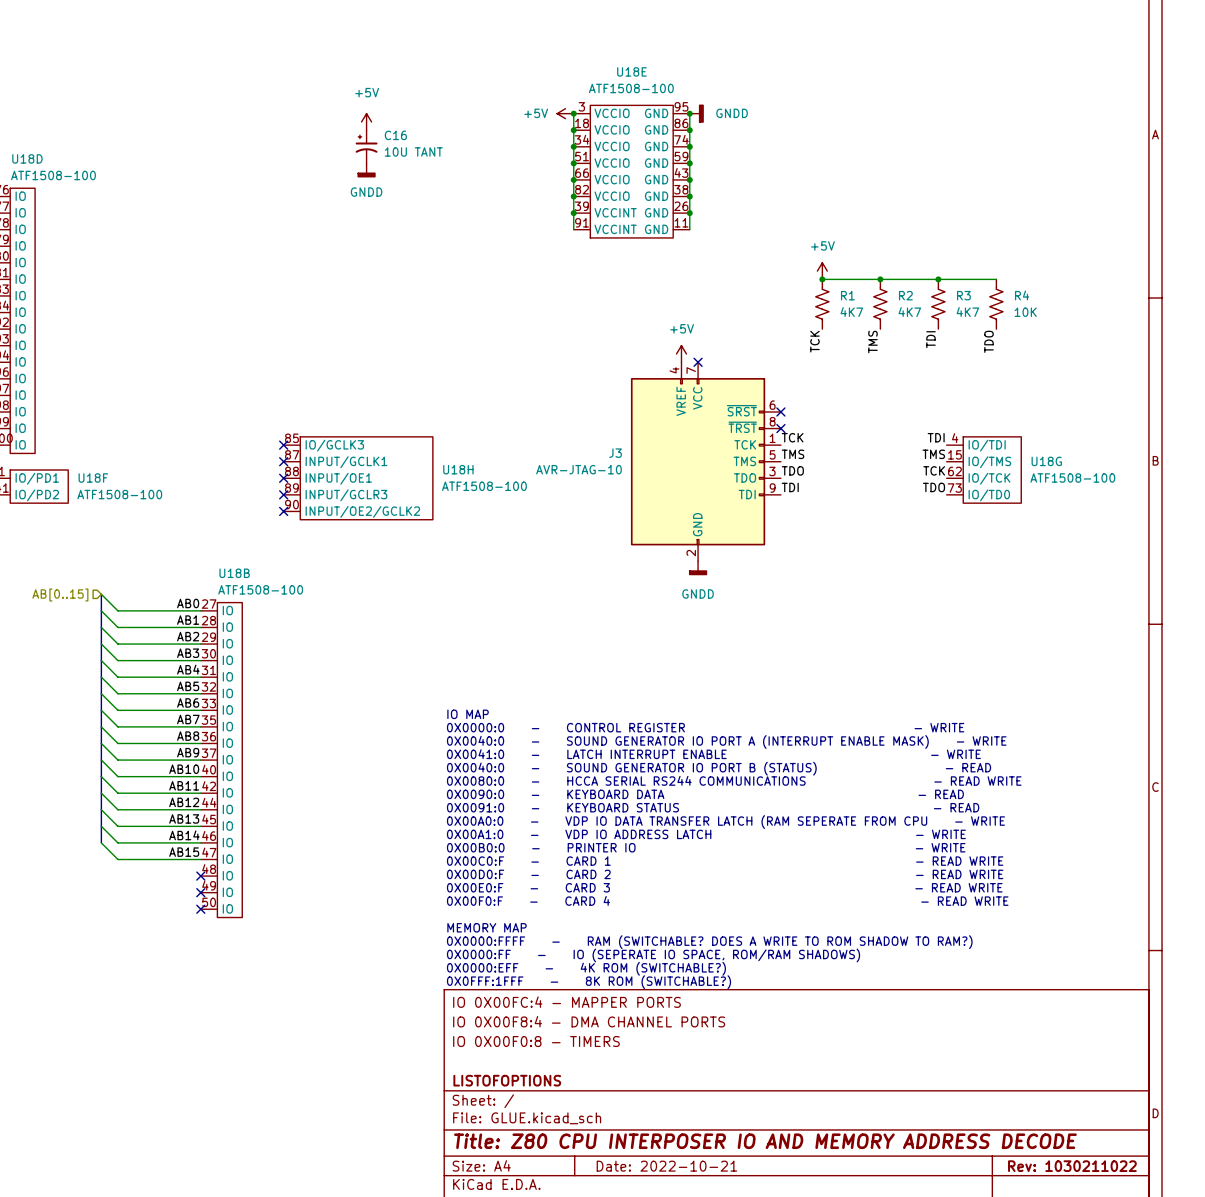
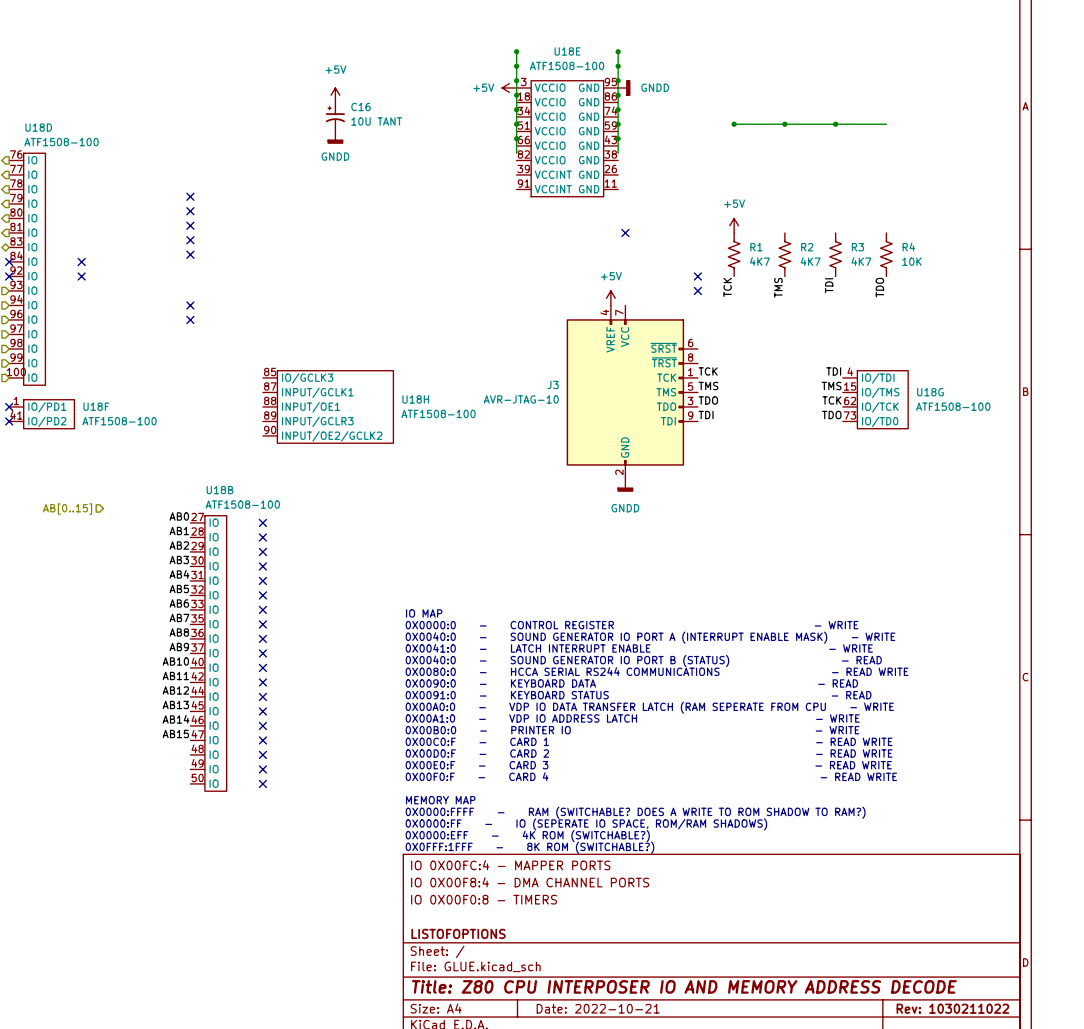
junction: none -> (516, 51)
junction: none -> (618, 51)
junction: none -> (516, 66)
junction: none -> (618, 66)
junction: none -> (516, 80)
junction: none -> (618, 80)
junction: (573, 113) -> none
junction: (689, 113) -> none
junction: none -> (516, 95)
junction: none -> (618, 95)
junction: (573, 130) -> none
junction: (689, 130) -> none
junction: none -> (516, 109)
junction: none -> (618, 109)
junction: (573, 146) -> none
junction: (689, 146) -> none
junction: none -> (516, 124)
junction: none -> (618, 124)
junction: none -> (734, 124)
junction: none -> (784, 124)
junction: none -> (835, 124)
junction: (573, 163) -> none
junction: (689, 163) -> none
junction: none -> (516, 138)
junction: none -> (618, 138)
junction: (573, 179) -> none
junction: (689, 179) -> none
wire: (573, 188) (573, 229) -> (516, 51) (516, 87)
wire: (689, 188) (689, 229) -> (618, 51) (618, 87)
junction: (573, 196) -> none
junction: (689, 196) -> none
junction: (573, 213) -> none
junction: (689, 213) -> none
no-connect mark: none -> (190, 196)
no-connect mark: none -> (190, 211)
no-connect mark: none -> (190, 225)
no-connect mark: none -> (625, 232)
wire: (822, 279) (996, 279) -> (734, 124) (886, 124)
junction: (822, 279) -> none
junction: (880, 279) -> none
junction: (938, 279) -> none
no-connect mark: none -> (190, 240)
no-connect mark: none -> (190, 254)
no-connect mark: none -> (81, 261)
no-connect mark: none -> (81, 276)
no-connect mark: none -> (697, 276)
no-connect mark: none -> (697, 290)
no-connect mark: none -> (190, 305)
no-connect mark: (698, 362) -> none
no-connect mark: none -> (190, 319)
no-connect mark: (780, 411) -> none
no-connect mark: (780, 428) -> none
no-connect mark: (283, 445) -> none
no-connect mark: (283, 461) -> none
no-connect mark: (283, 478) -> none
no-connect mark: (283, 494) -> none
no-connect mark: (283, 511) -> none
wire: (101, 594) (117, 610) (200, 610) -> none
bus: (101, 594) (101, 842) -> none
wire: (101, 610) (117, 627) (200, 627) -> none
no-connect mark: none -> (262, 522)
wire: (101, 627) (117, 644) (200, 644) -> none
no-connect mark: none -> (262, 537)
wire: (101, 644) (117, 660) (200, 660) -> none
no-connect mark: none -> (262, 551)
wire: (101, 660) (117, 677) (200, 677) -> none
no-connect mark: none -> (262, 566)
wire: (101, 677) (117, 693) (200, 693) -> none
no-connect mark: none -> (262, 580)
wire: (101, 693) (117, 710) (200, 710) -> none
no-connect mark: none -> (262, 595)
wire: (101, 710) (117, 726) (200, 726) -> none
no-connect mark: none -> (262, 609)
wire: (101, 726) (117, 743) (200, 743) -> none
no-connect mark: none -> (262, 624)
wire: (101, 743) (117, 760) (200, 760) -> none
no-connect mark: none -> (262, 638)
wire: (101, 760) (117, 776) (200, 776) -> none
no-connect mark: none -> (262, 653)
wire: (101, 776) (117, 793) (200, 793) -> none
no-connect mark: none -> (262, 667)
wire: (101, 793) (117, 809) (200, 809) -> none
no-connect mark: none -> (262, 682)
wire: (101, 809) (117, 826) (200, 826) -> none
no-connect mark: none -> (262, 696)
wire: (101, 826) (117, 842) (200, 842) -> none
no-connect mark: none -> (262, 711)
wire: (101, 842) (117, 859) (200, 859) -> none
no-connect mark: none -> (262, 725)
no-connect mark: none -> (262, 740)
no-connect mark: (200, 876) -> none
no-connect mark: none -> (262, 754)
no-connect mark: (200, 892) -> none
no-connect mark: none -> (262, 769)
no-connect mark: (200, 909) -> none
no-connect mark: none -> (262, 783)

